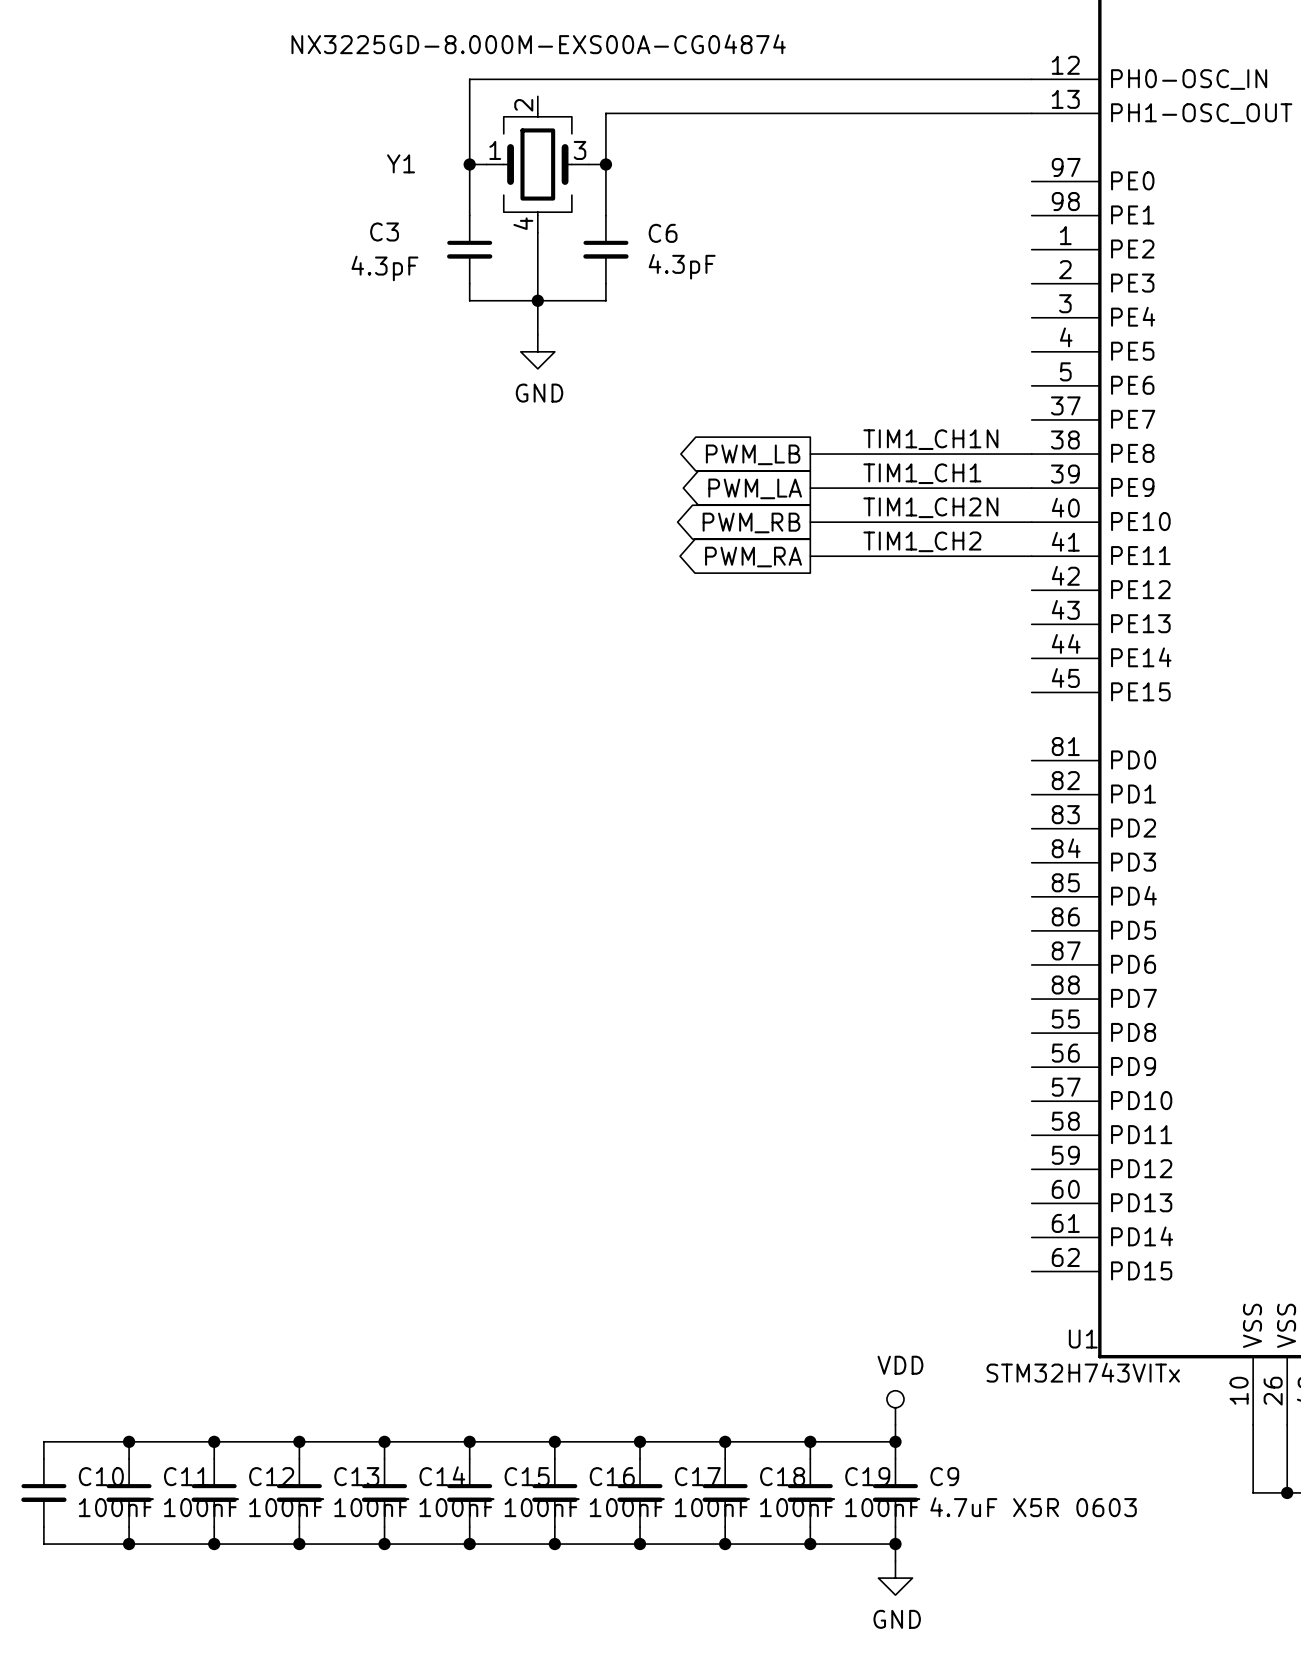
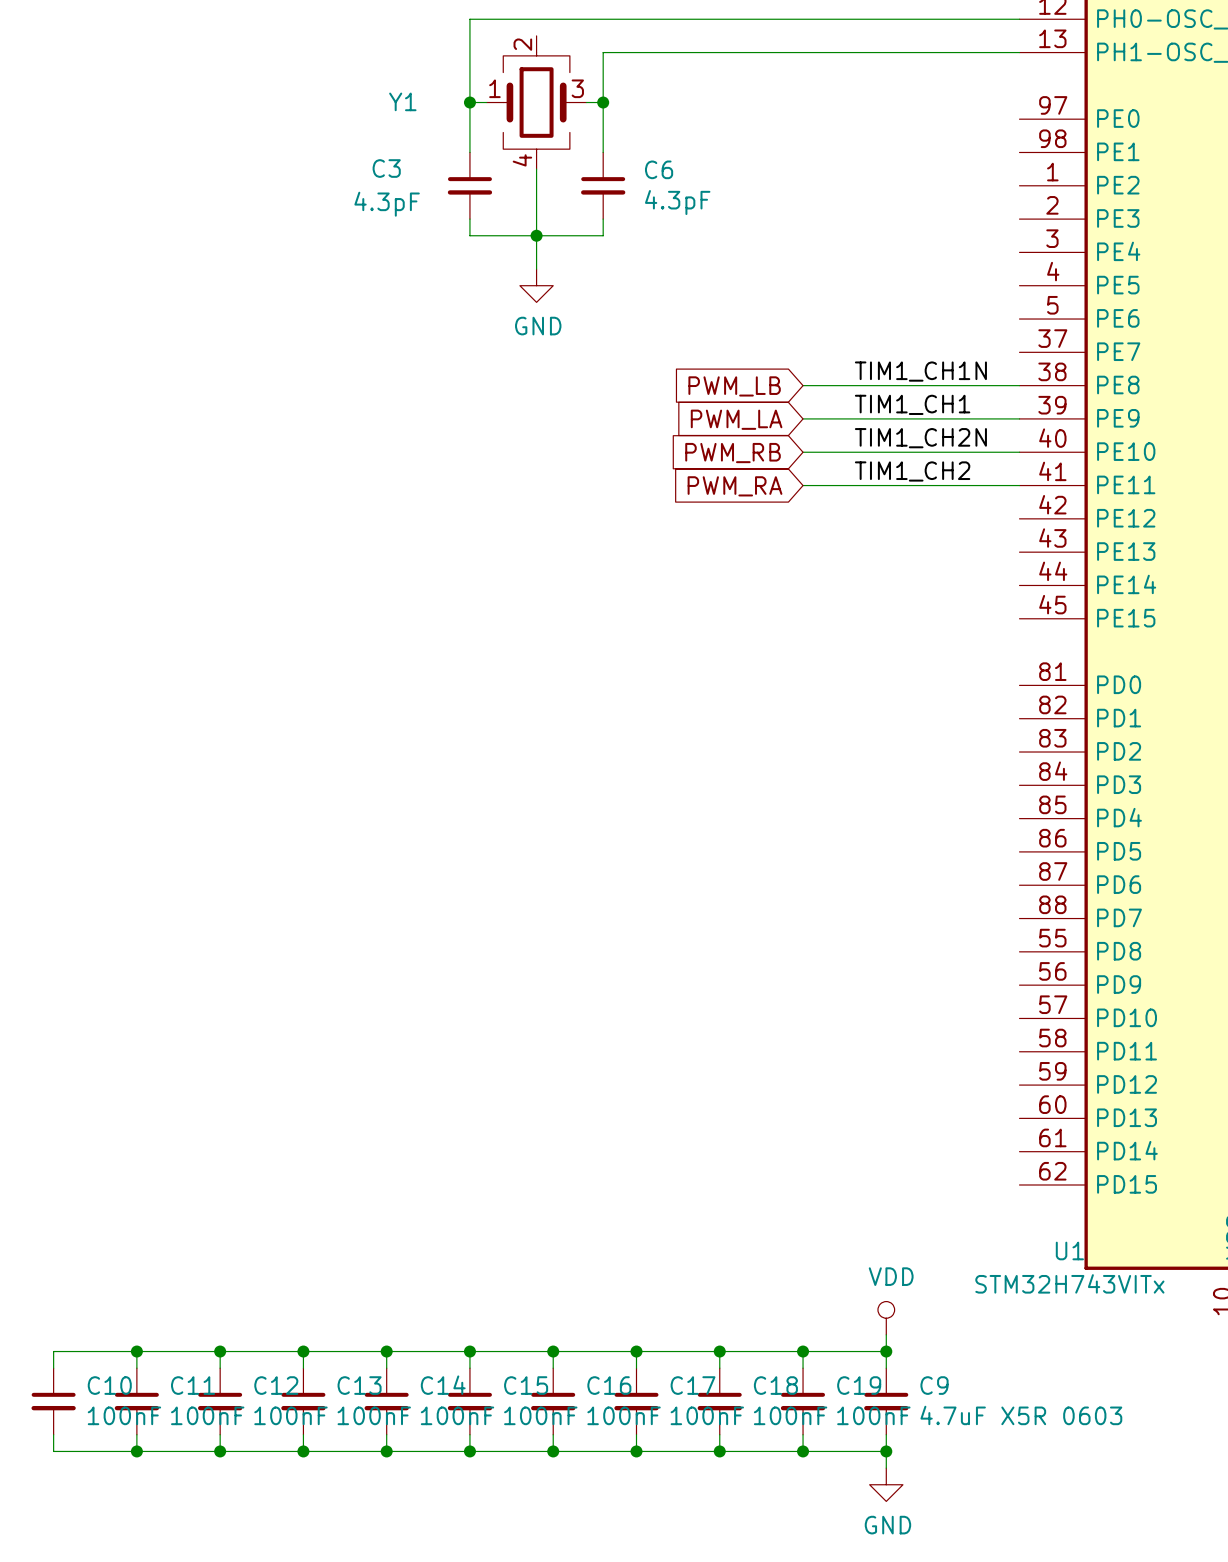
global label shape: output (753, 454) -> input (734, 386)
global label shape: output (755, 488) -> input (736, 419)
global label shape: output (751, 522) -> input (733, 453)
global label shape: output (753, 557) -> input (735, 486)

